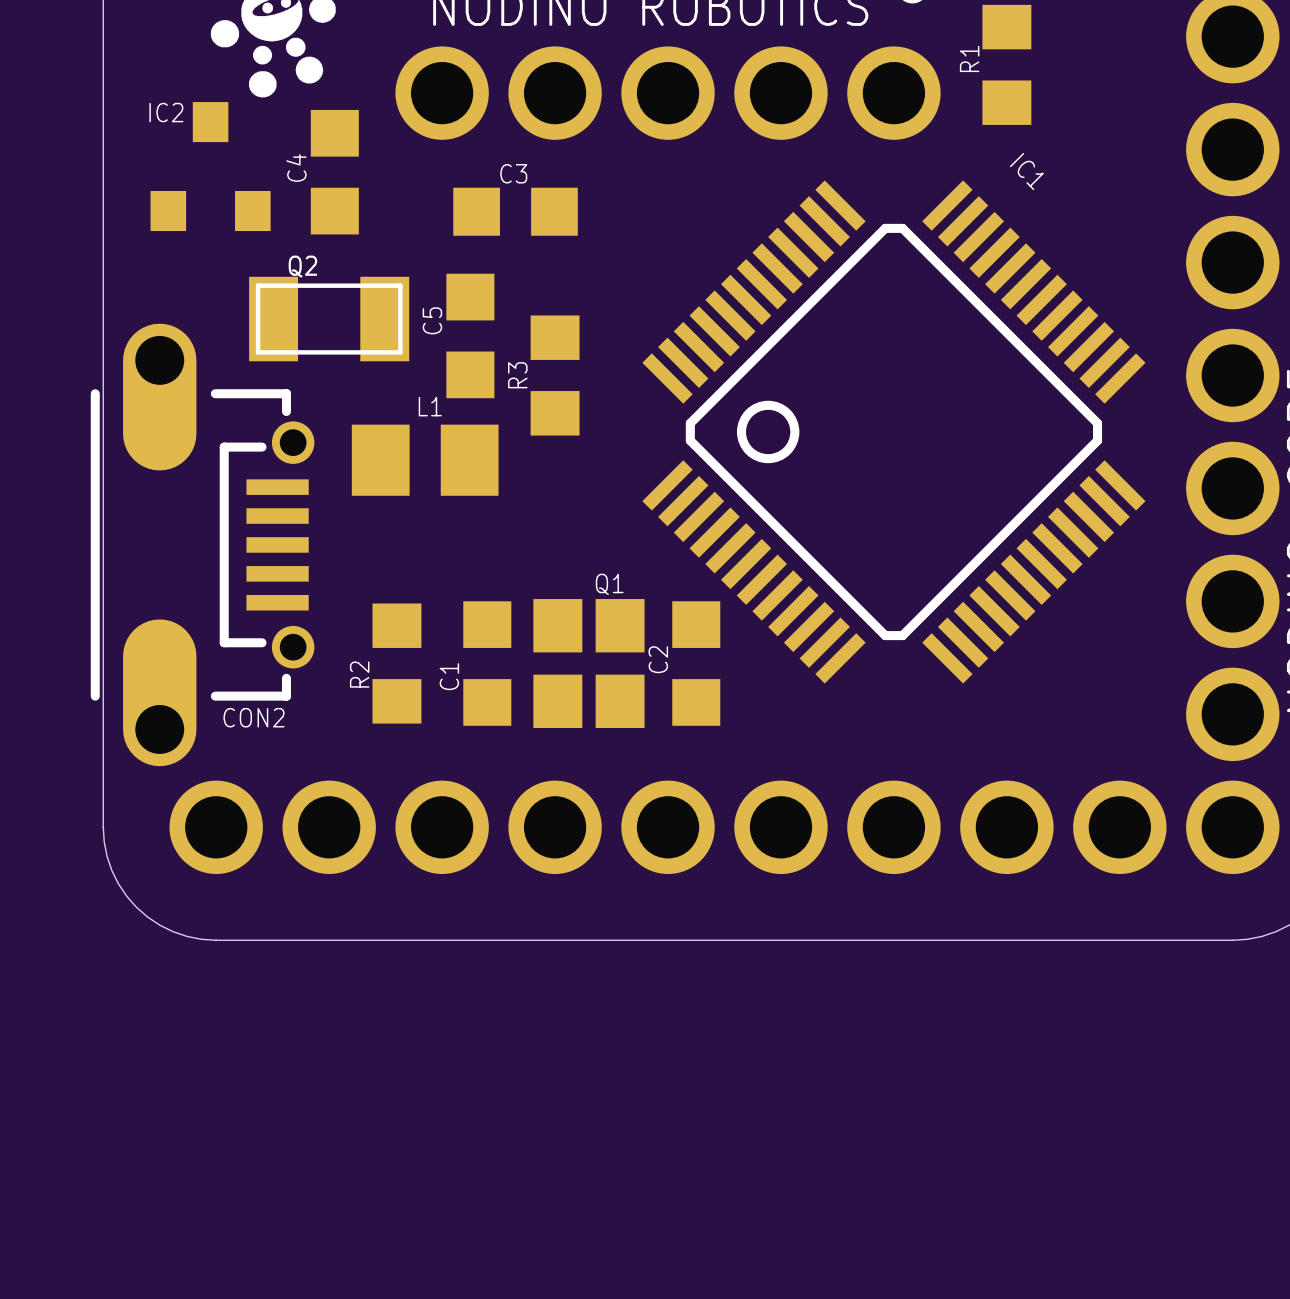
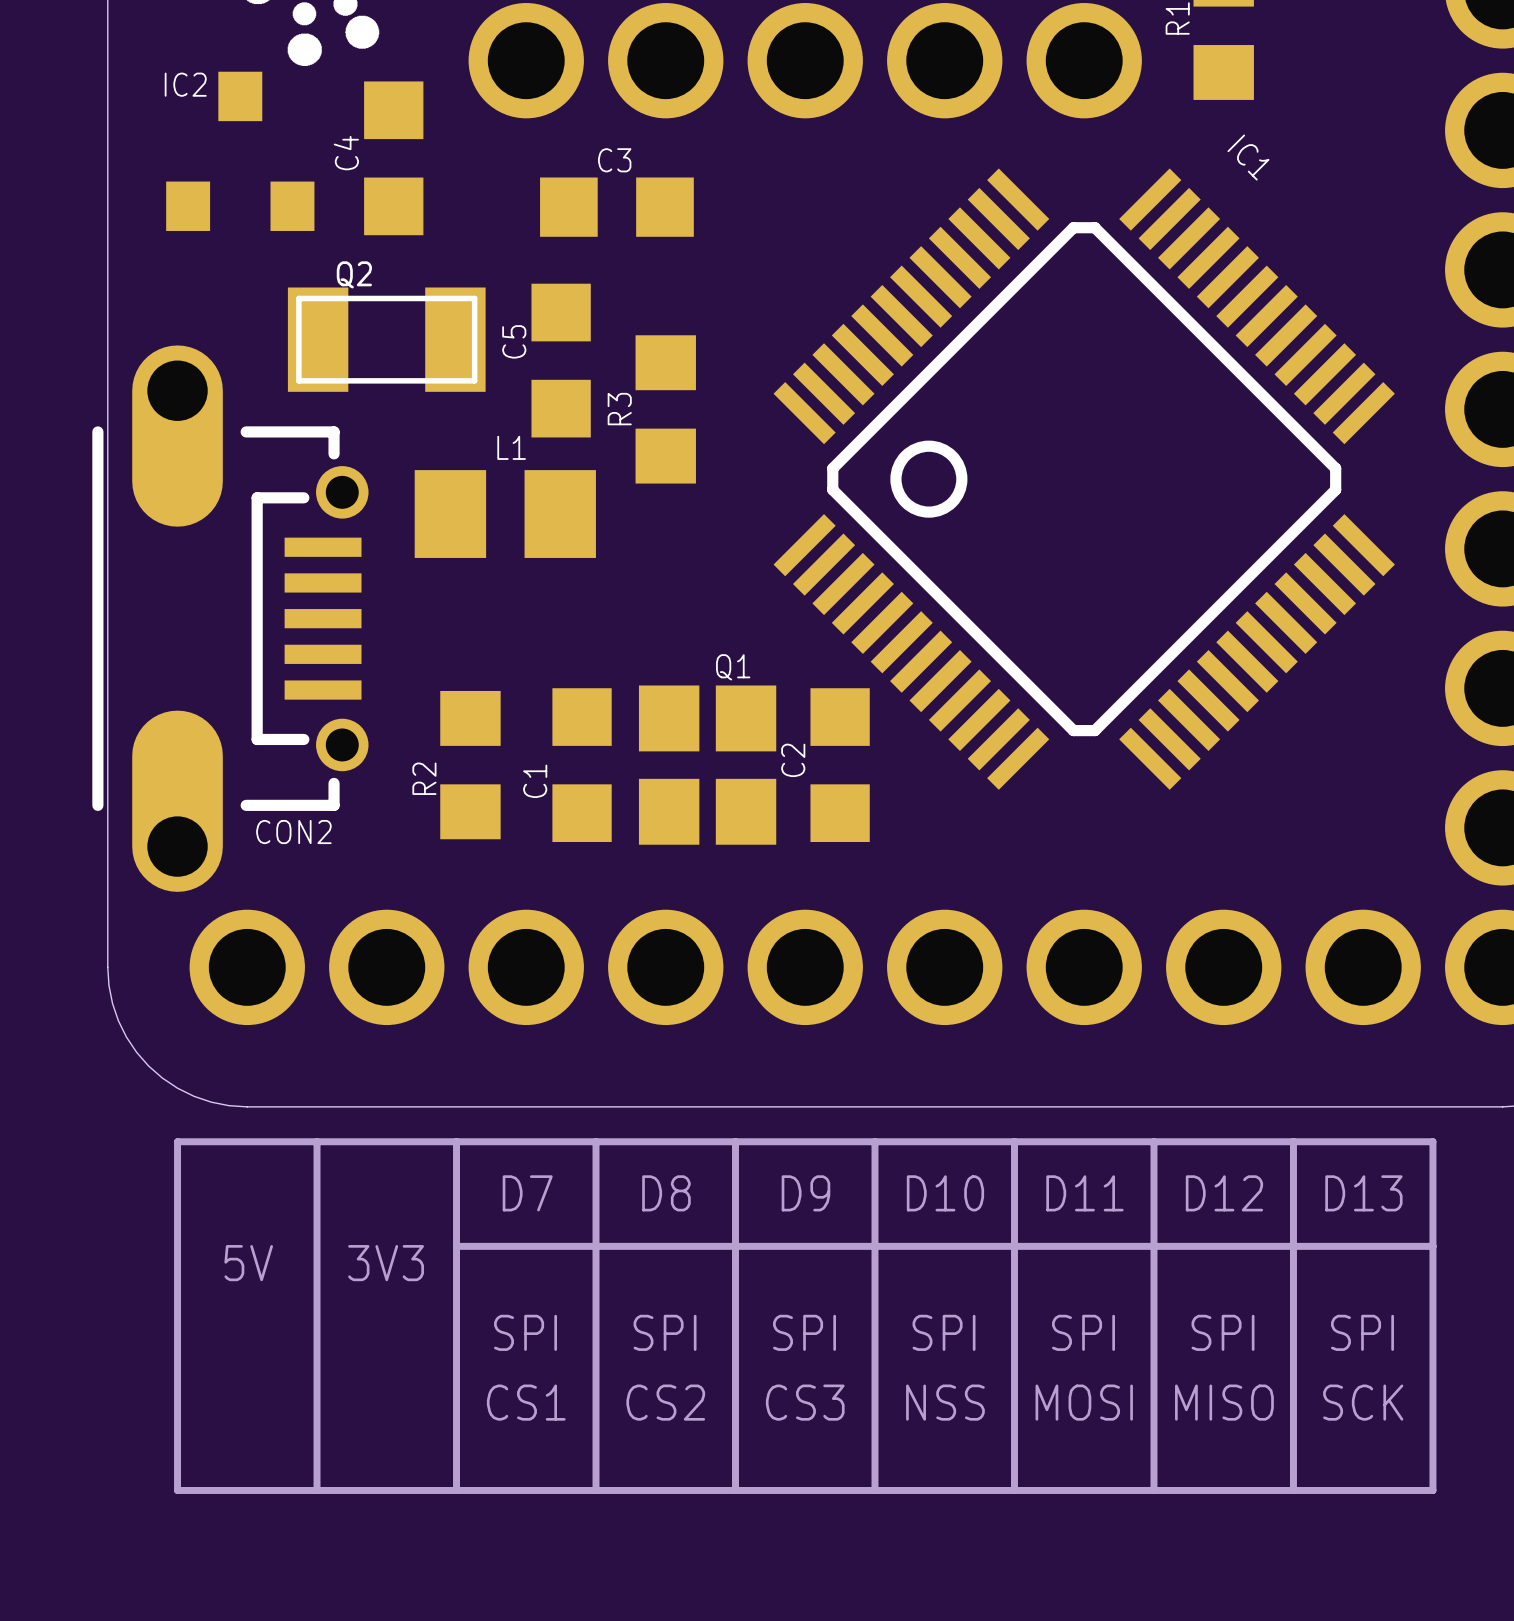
line: none -> (177, 1141) (1432, 1141) (1432, 1490) (177, 1490) (177, 1141)
line: none -> (317, 1141) (317, 1490)
line: none -> (456, 1141) (456, 1490)
line: none -> (596, 1141) (596, 1490)
line: none -> (735, 1141) (735, 1490)
line: none -> (874, 1141) (874, 1490)
line: none -> (1014, 1141) (1014, 1490)
line: none -> (1153, 1141) (1153, 1490)
line: none -> (1293, 1141) (1293, 1490)
text: none -> D7 (527, 1193)
text: none -> D8 (666, 1193)
text: none -> D9 (805, 1193)
text: none -> D10 (945, 1193)
text: none -> D11 (1084, 1193)
text: none -> D12 (1224, 1193)
text: none -> D13 (1363, 1193)
line: none -> (456, 1246) (1432, 1246)
text: none -> 5V (248, 1263)
text: none -> 3V3 (386, 1263)
text: none -> SPI (525, 1332)
text: none -> SPI (665, 1332)
text: none -> SPI (804, 1332)
text: none -> SPI (944, 1332)
text: none -> SPI (1083, 1332)
text: none -> SPI (1223, 1332)
text: none -> SPI (1362, 1332)
text: none -> CS1 (526, 1402)
text: none -> CS2 (665, 1402)
text: none -> CS3 (805, 1402)
text: none -> NSS (945, 1402)
text: none -> MOSI (1084, 1402)
text: none -> MISO (1224, 1402)
text: none -> SCK (1363, 1402)

